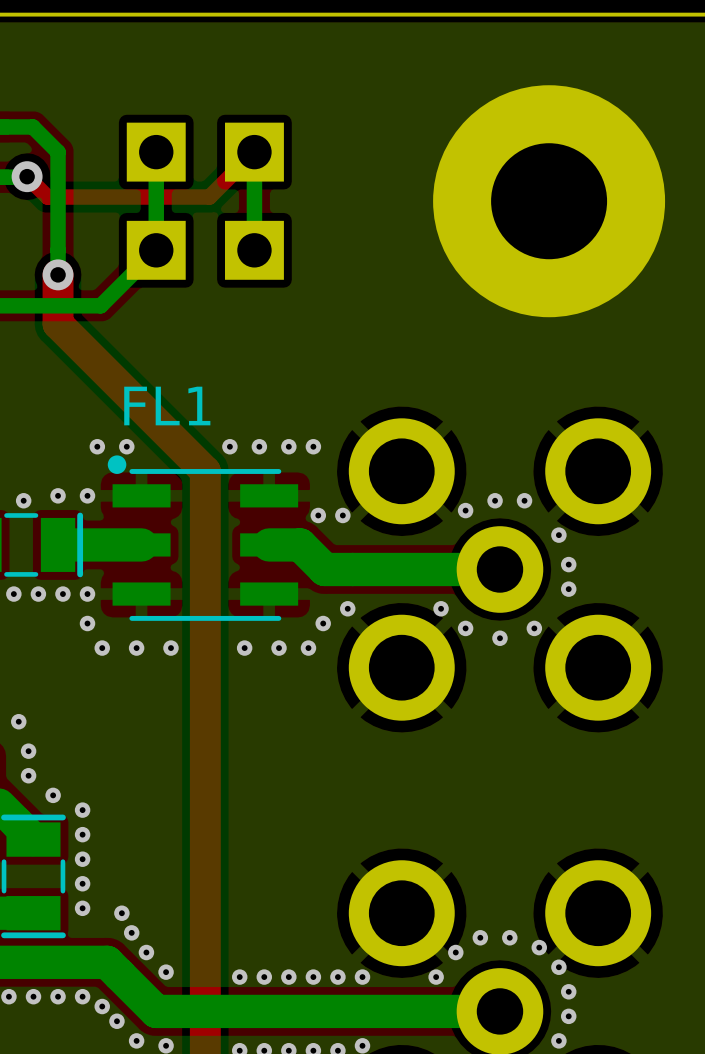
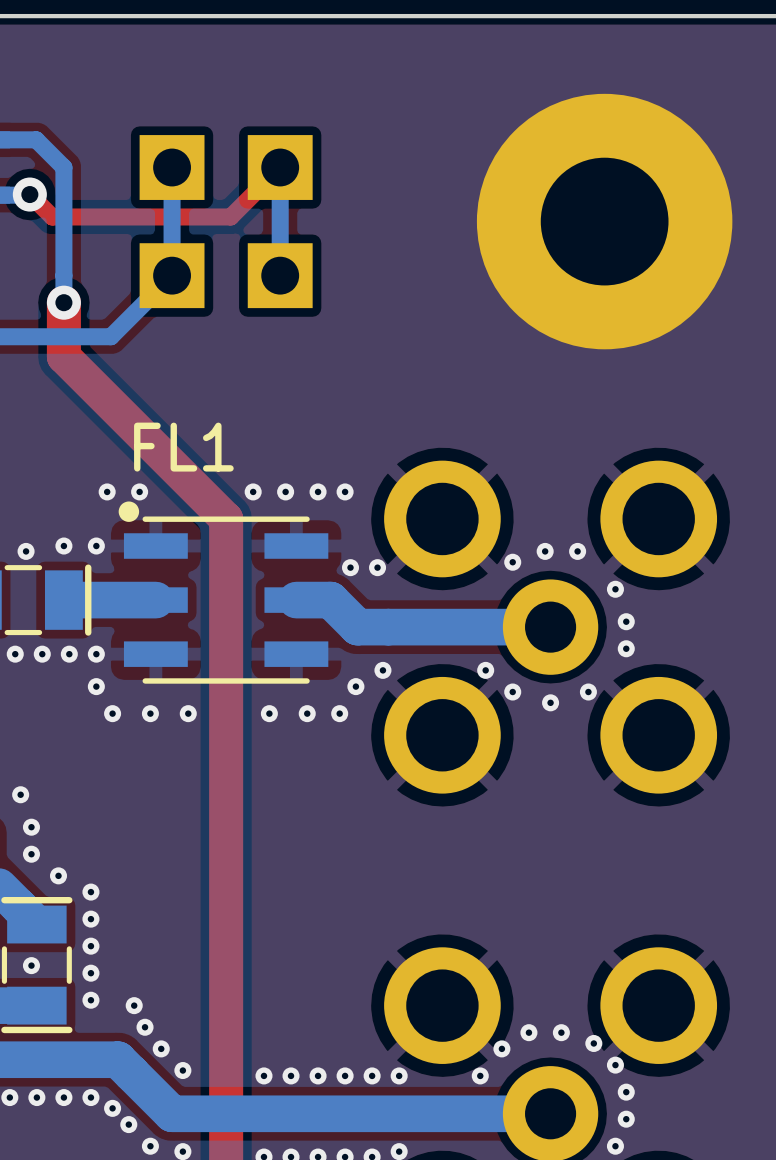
via: none -> (31, 965)

